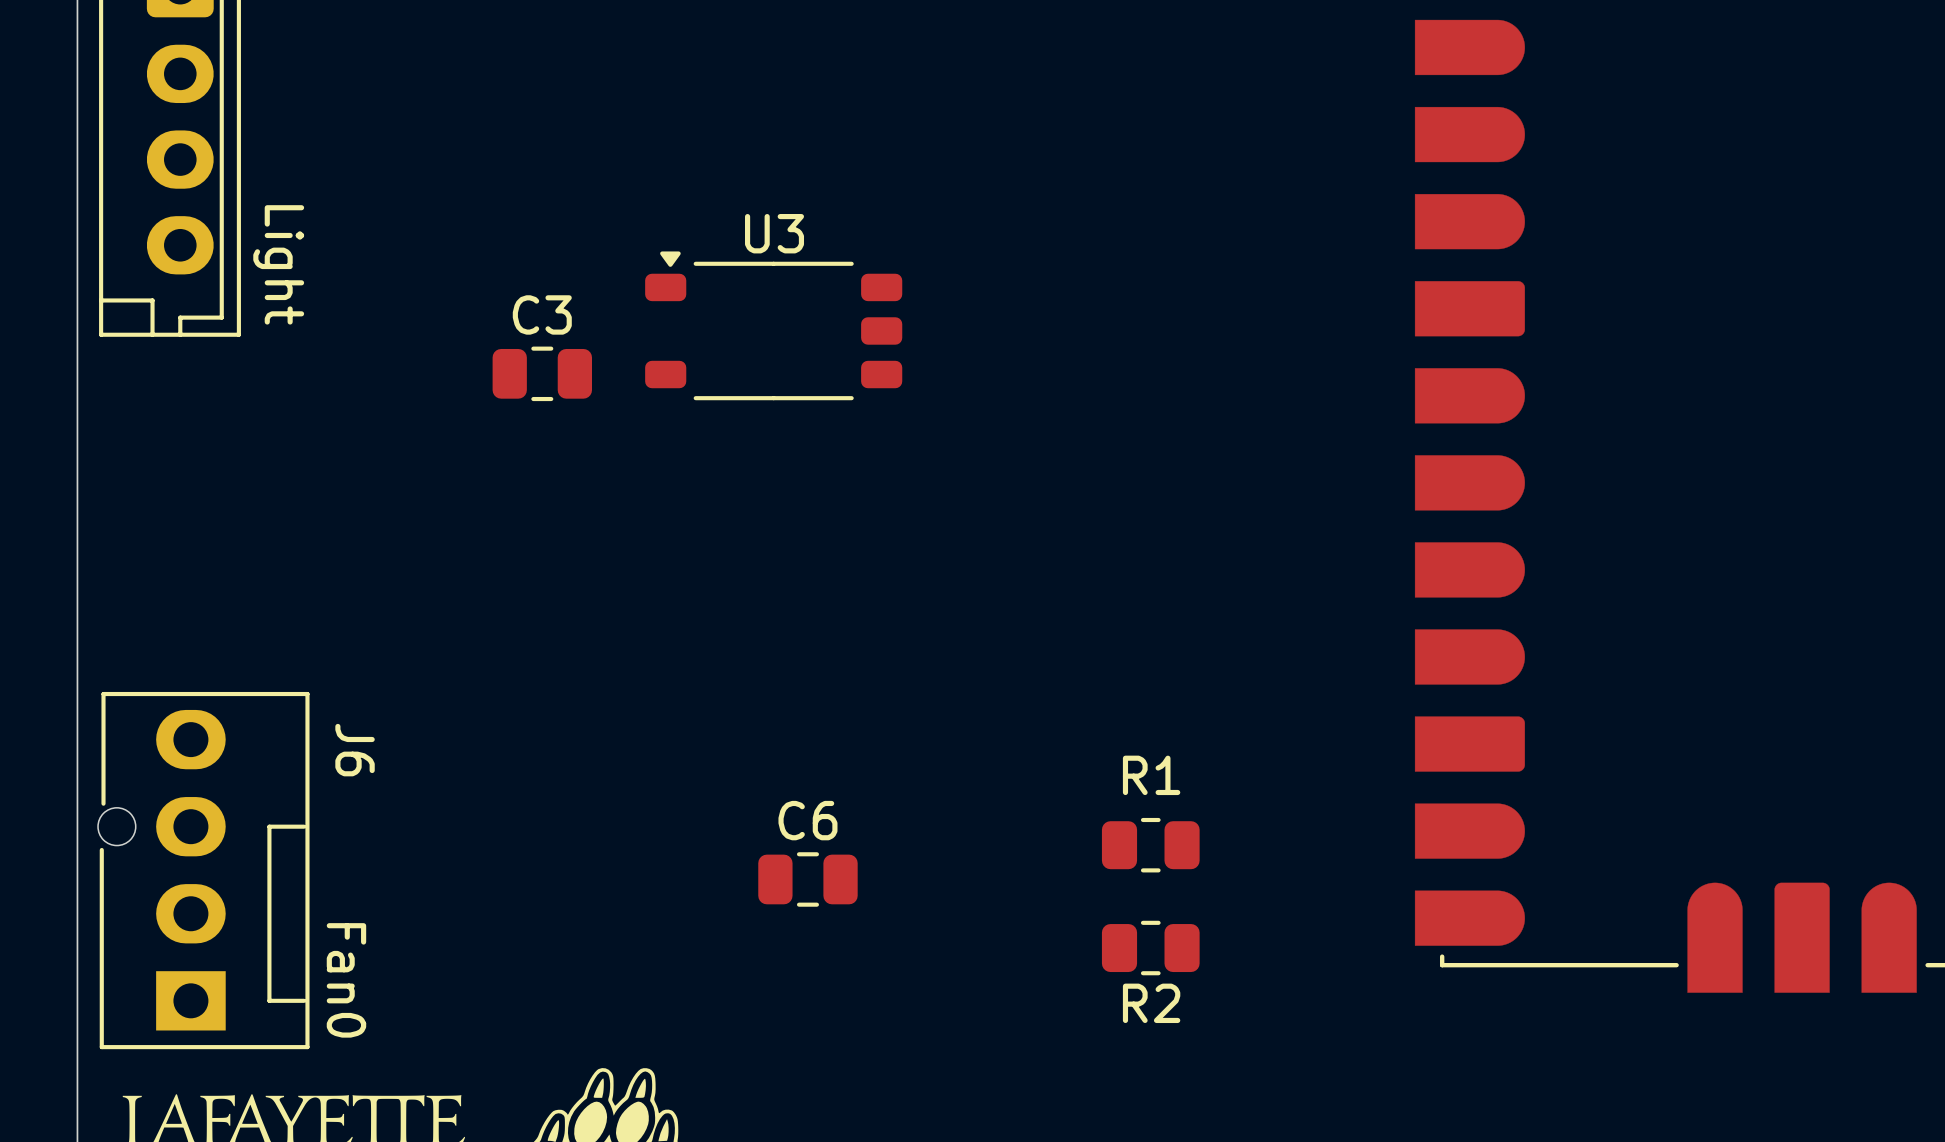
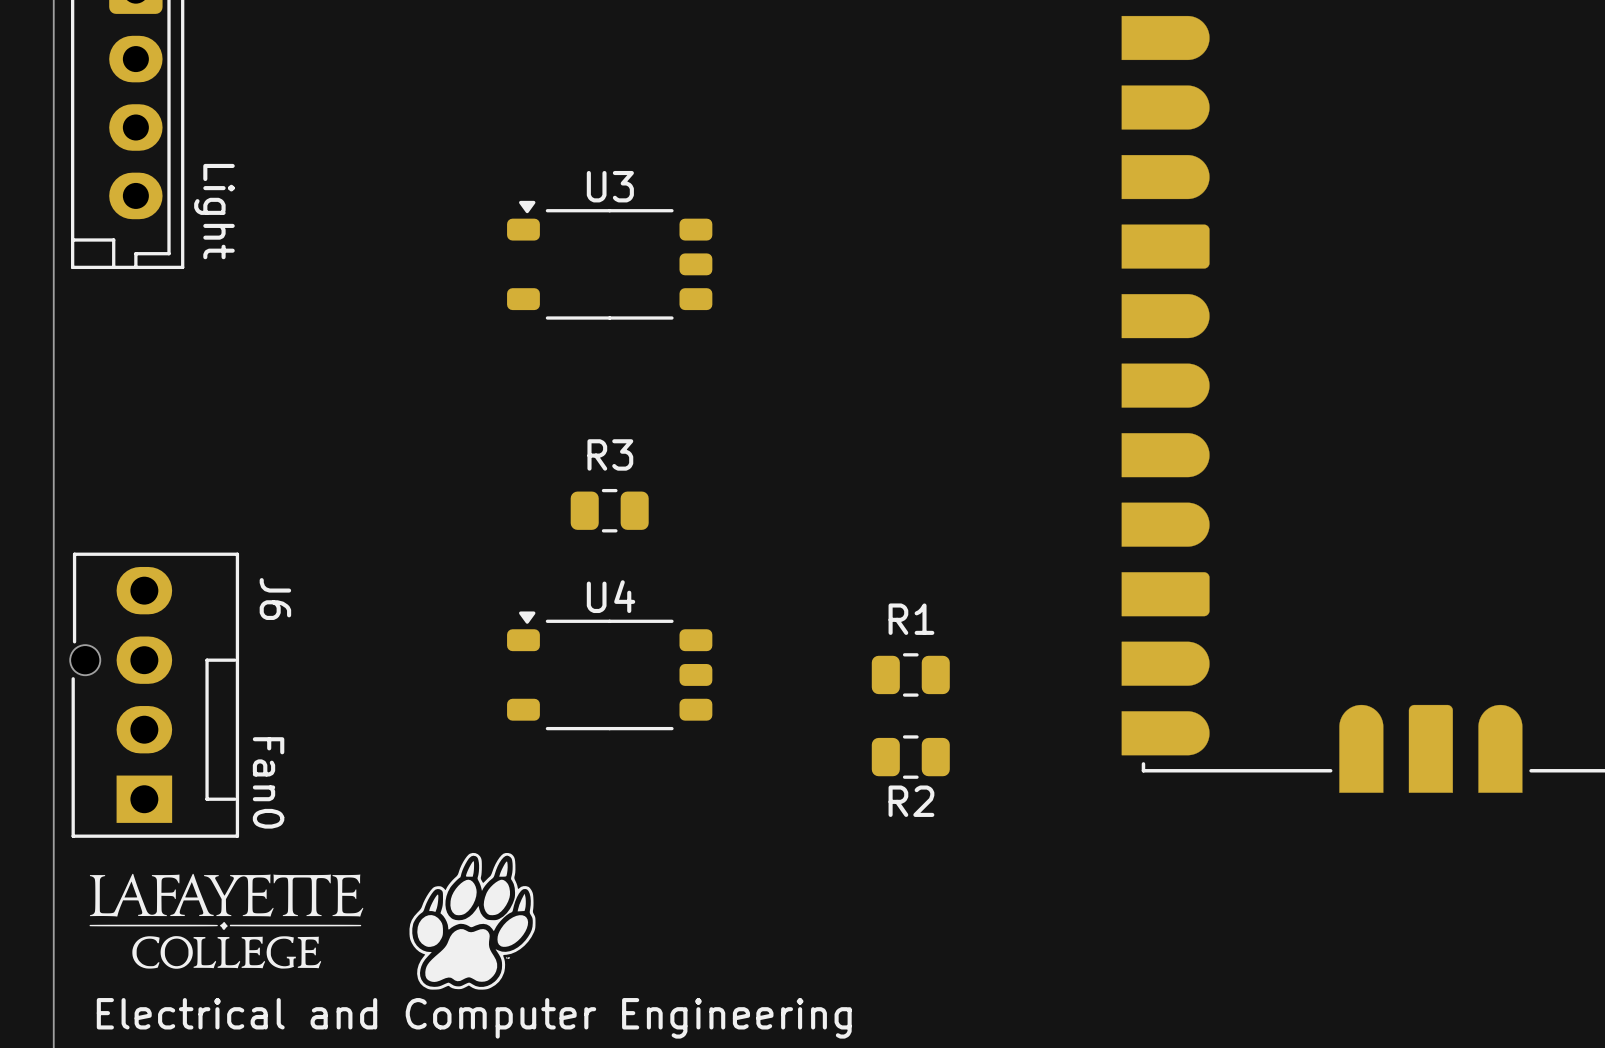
C3: (542, 373) -> none
R3: none -> (609, 510)
U4: none -> (609, 670)
C6: (807, 879) -> none

